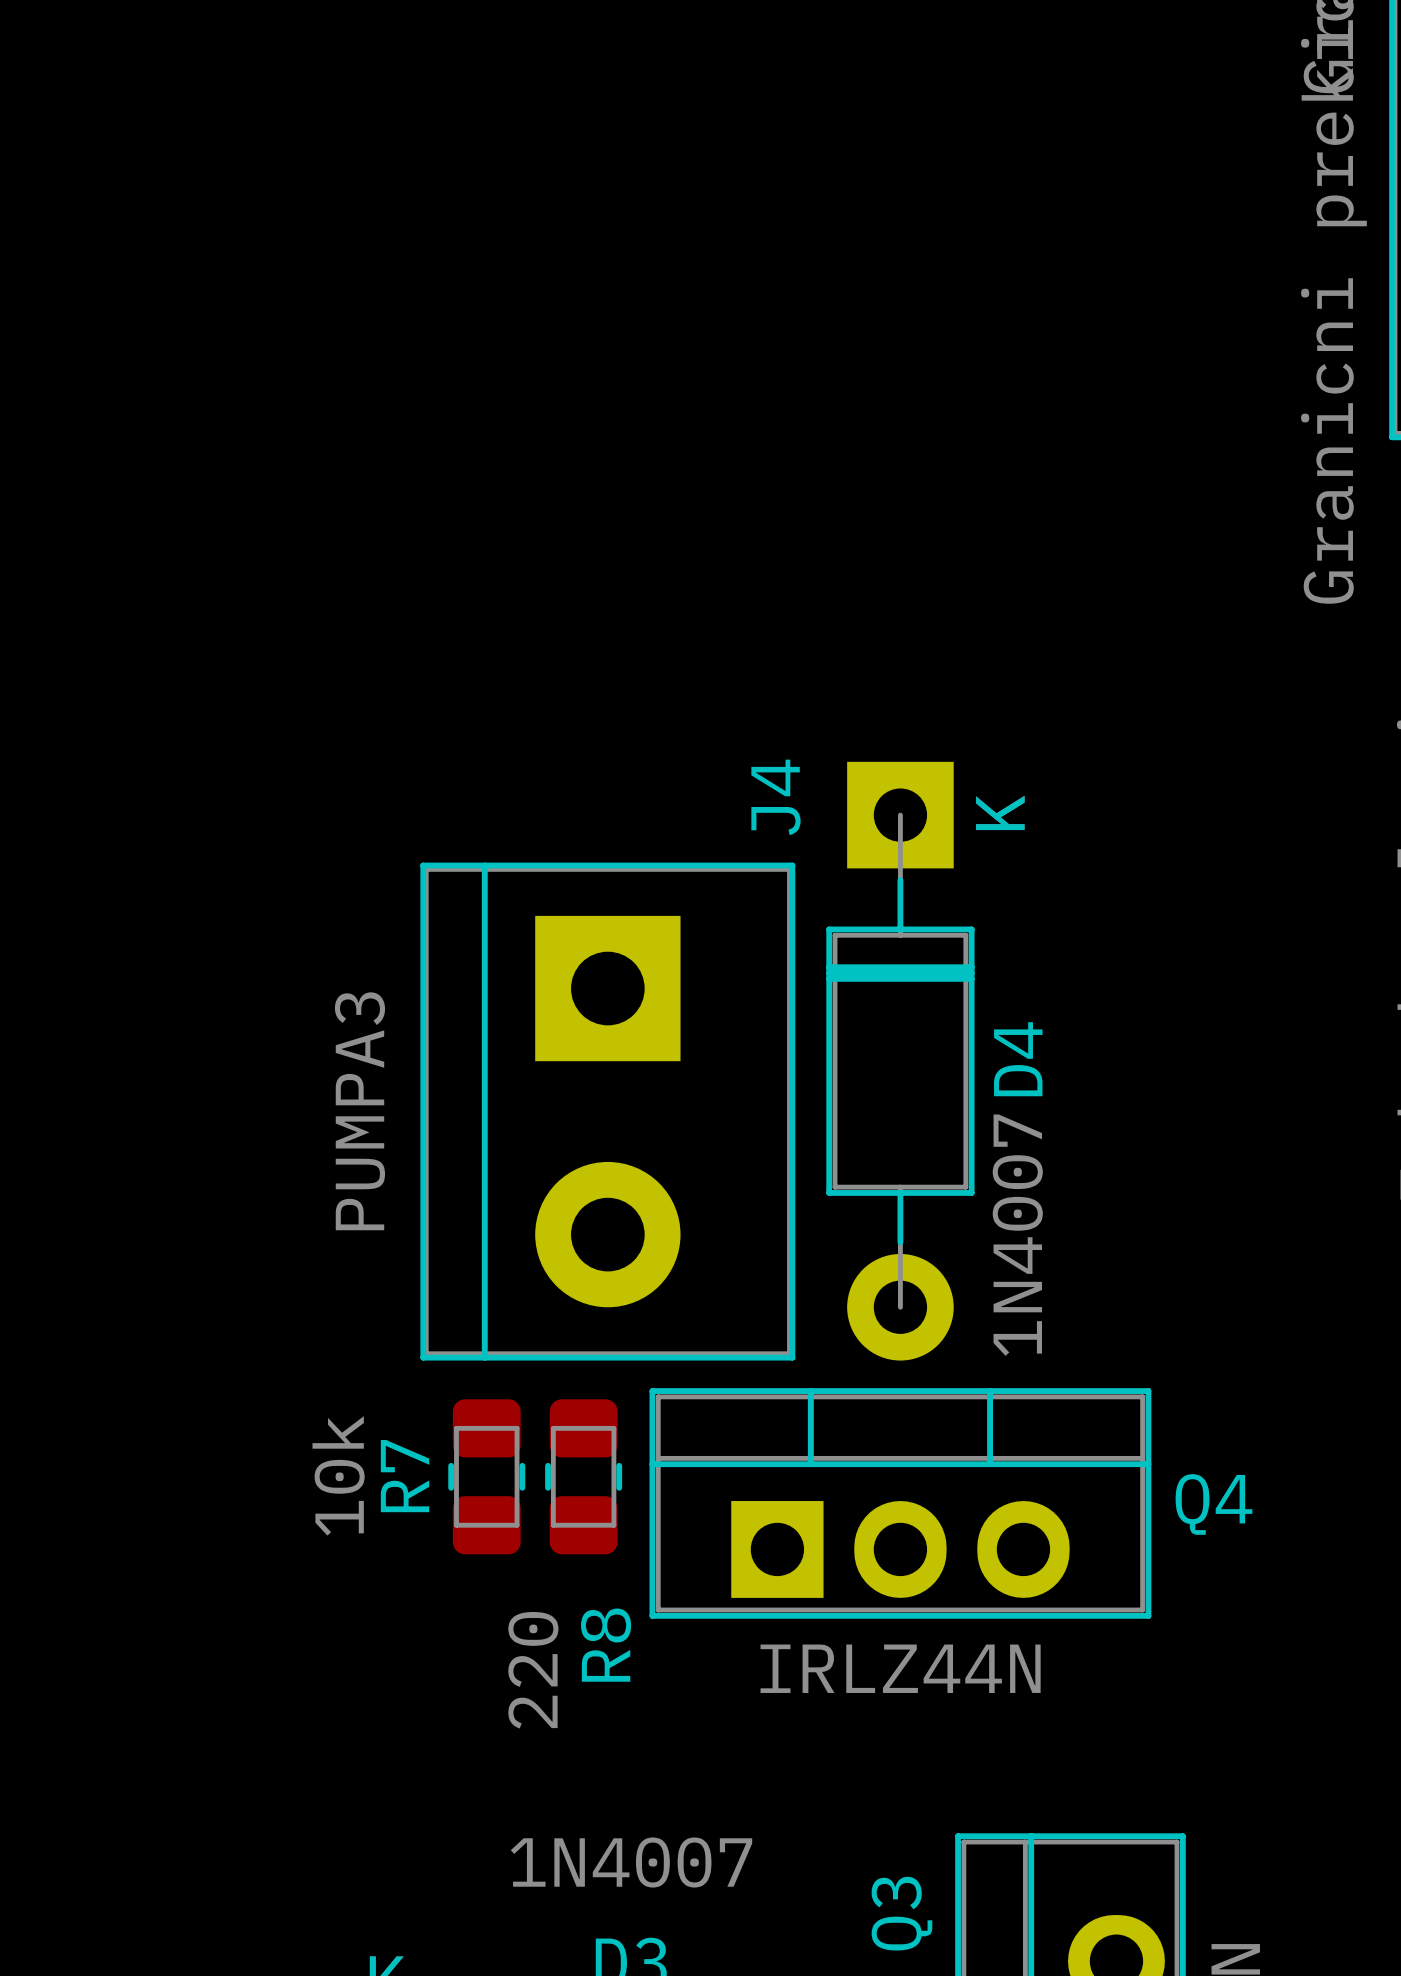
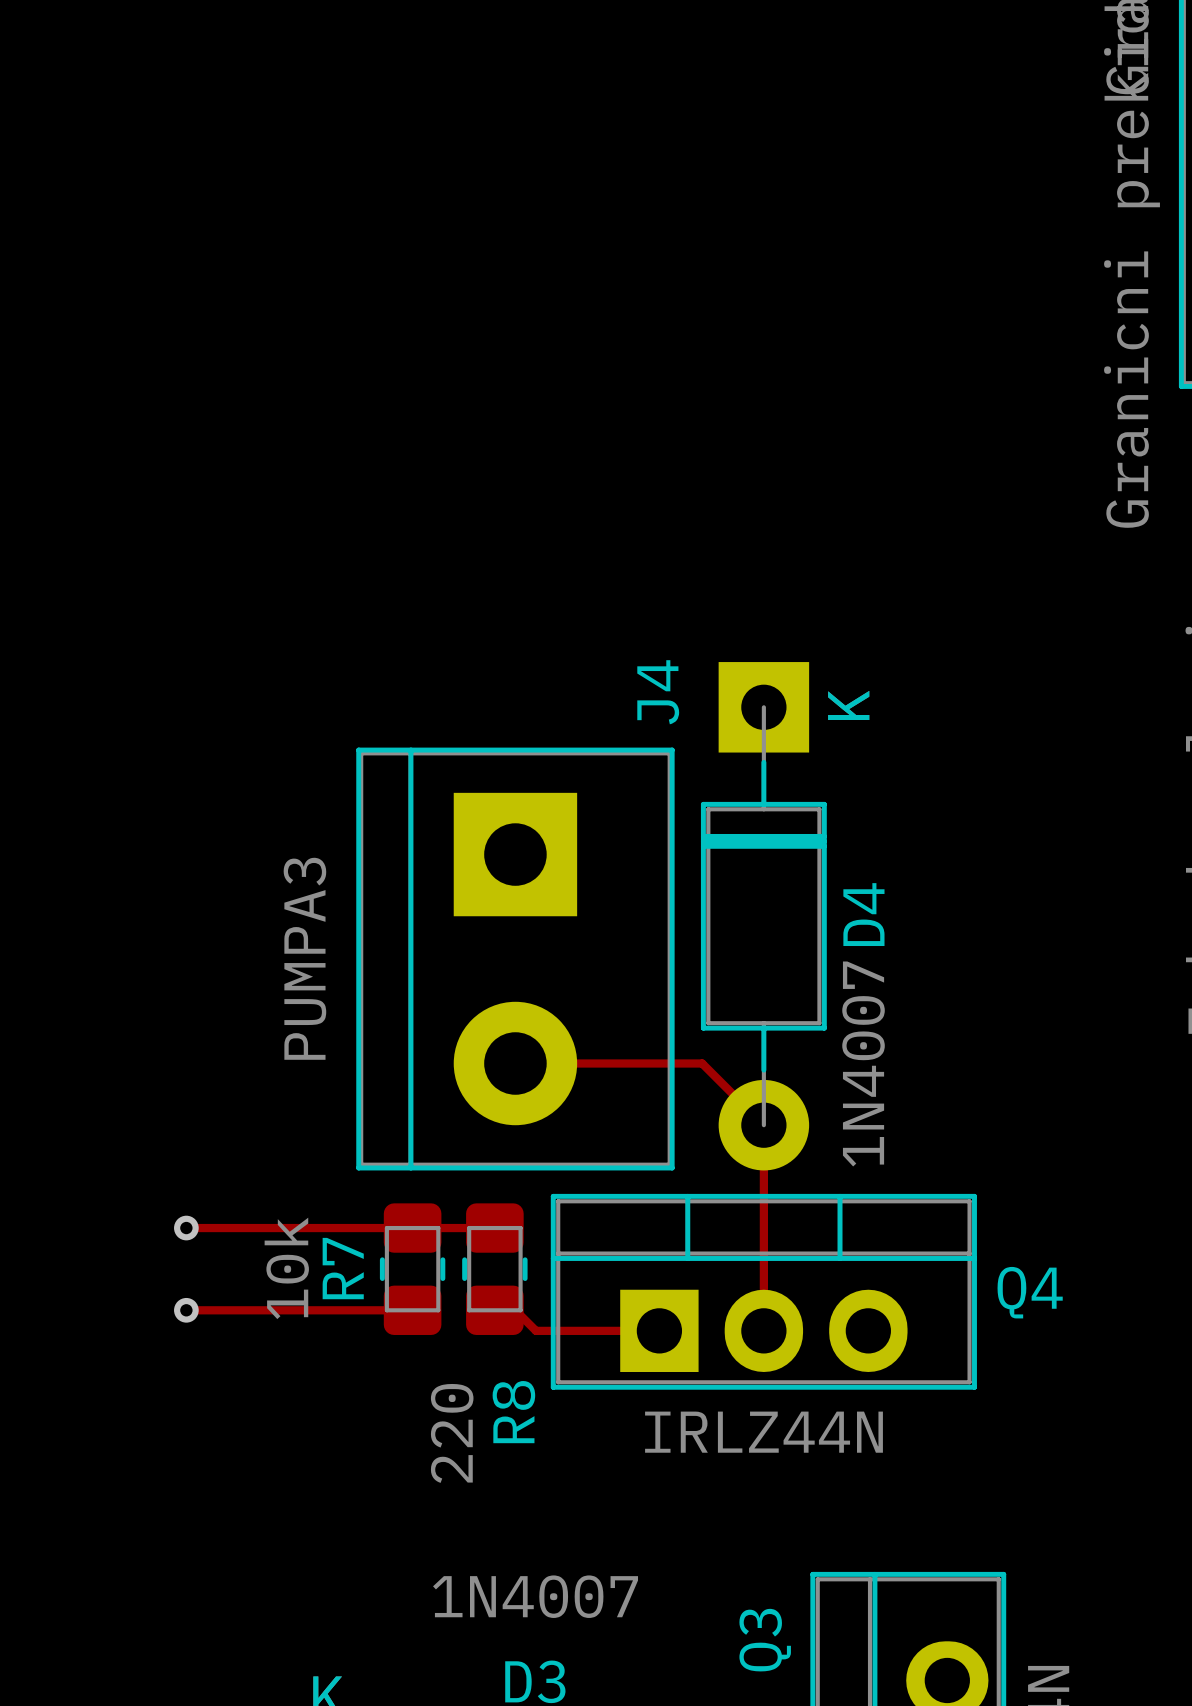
track: none -> (515, 1063) (702, 1063) (763, 1125) (763, 1330)
track: none -> (186, 1228) (494, 1228)
via: none -> (186, 1228)
track: none -> (186, 1310) (412, 1310)
via: none -> (186, 1310)
track: none -> (494, 1310) (515, 1310) (536, 1330) (659, 1330)

